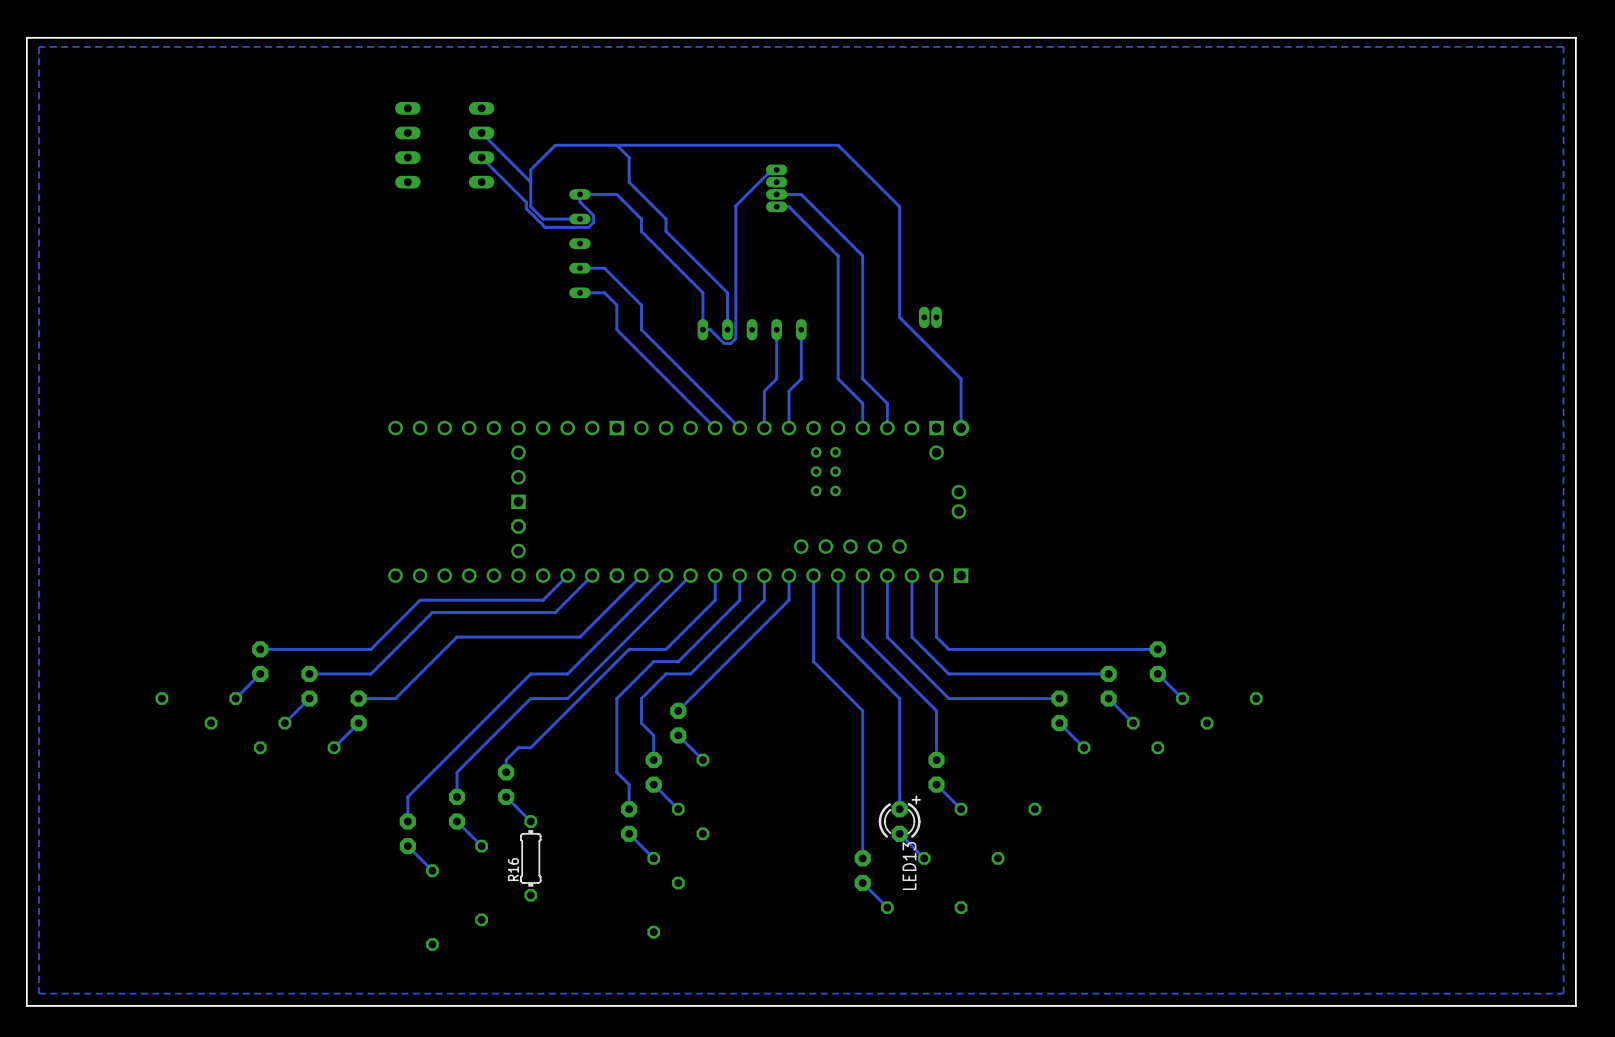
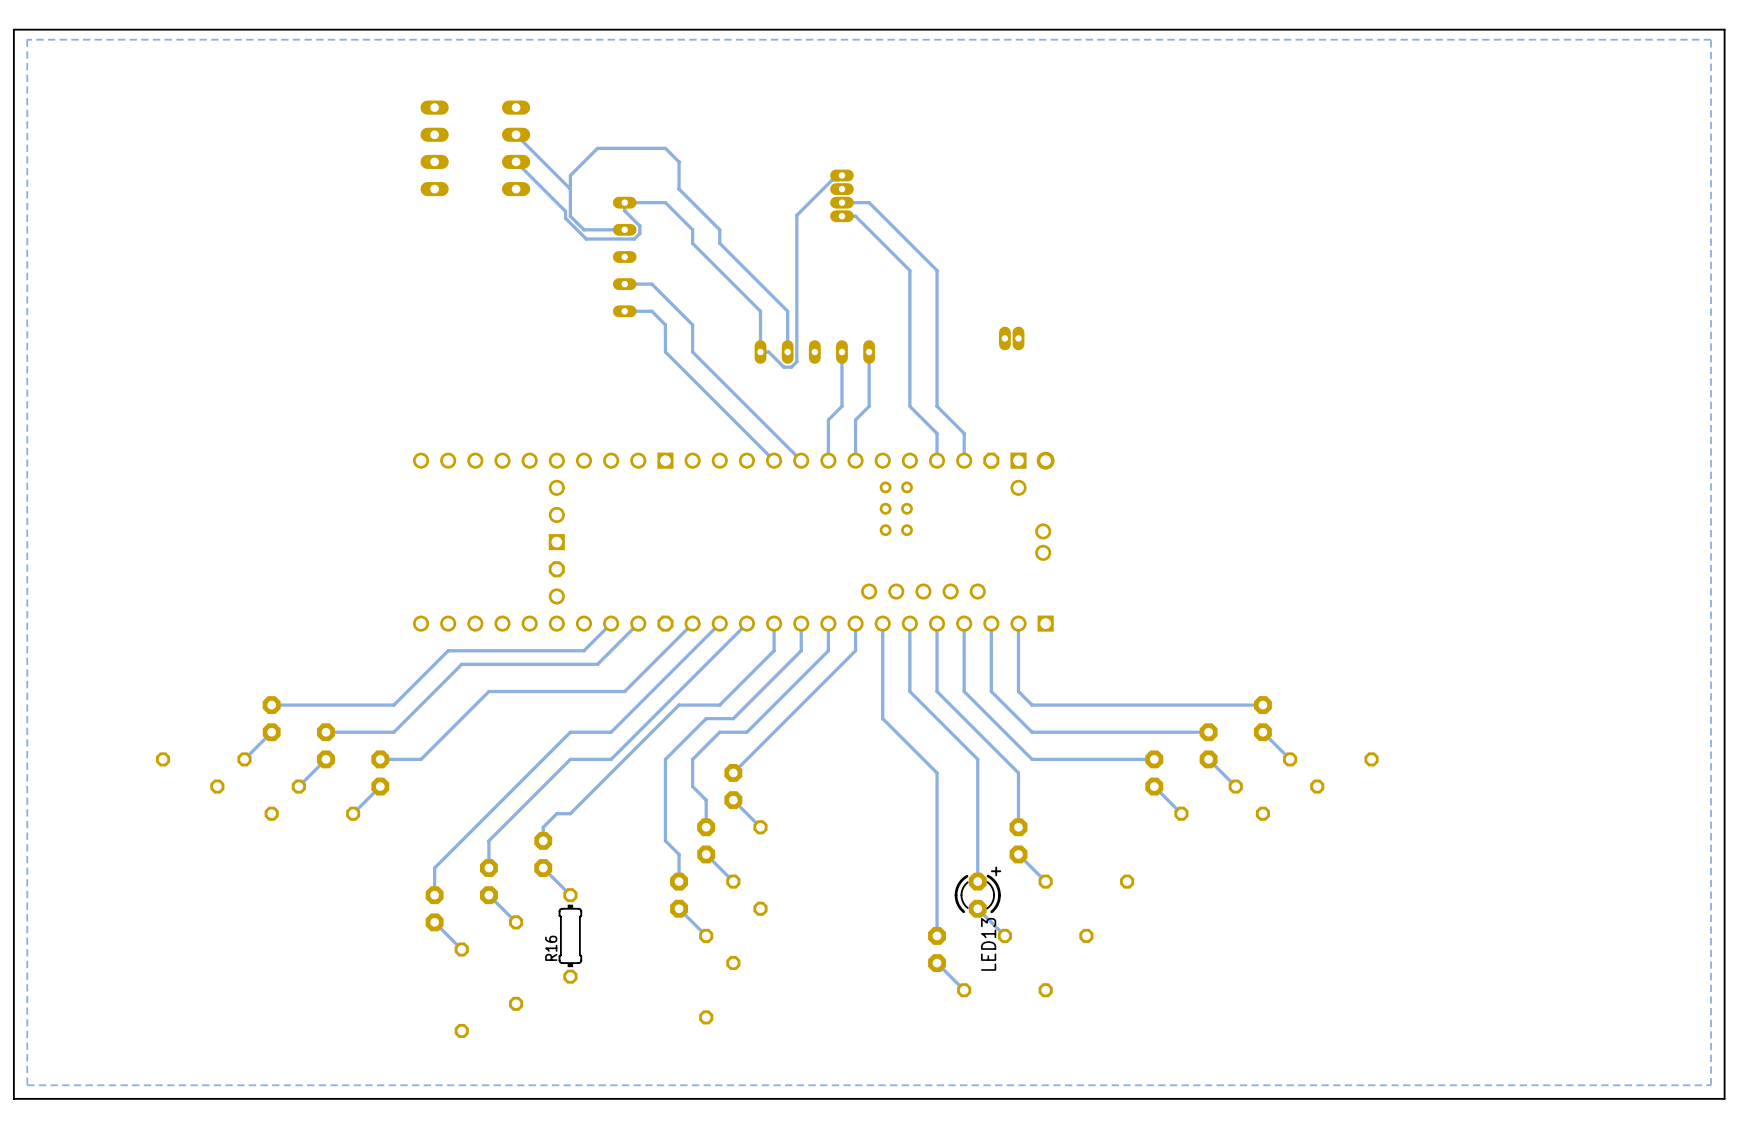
bottom track: (616, 145) (838, 145) (899, 206) (899, 317) (961, 378) (961, 428) -> none

